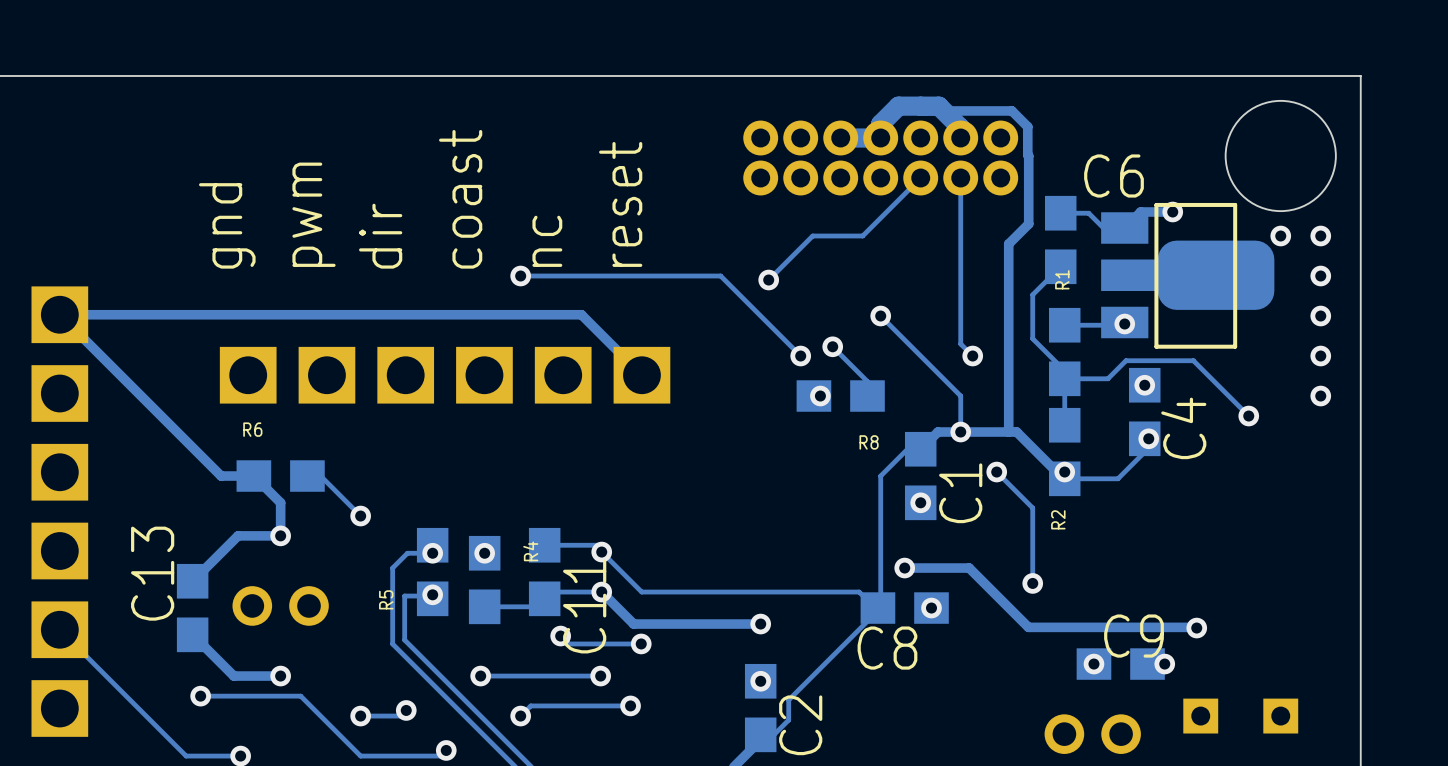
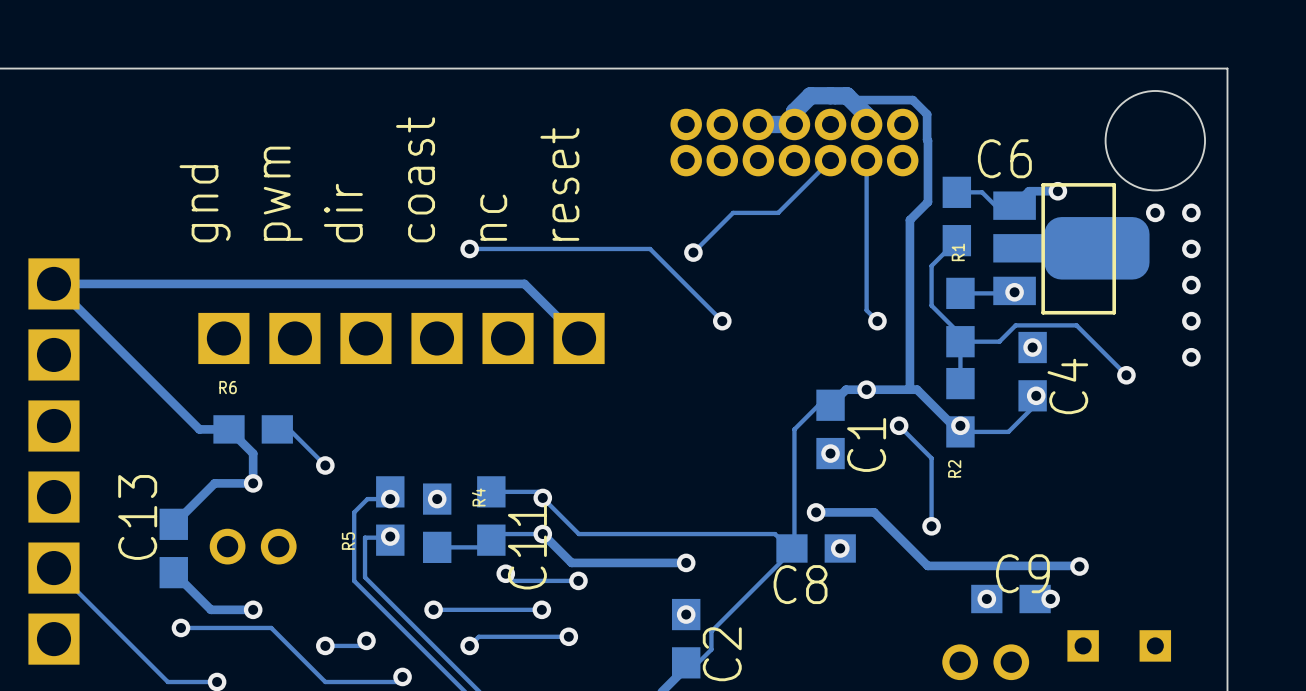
track: (880, 316) (960, 396) (960, 432) -> none
via: (880, 316) -> none
track: (832, 346) (867, 381) (867, 396) -> none
via: (832, 346) -> none
via: (820, 396) -> none
R8: (840, 396) -> none

